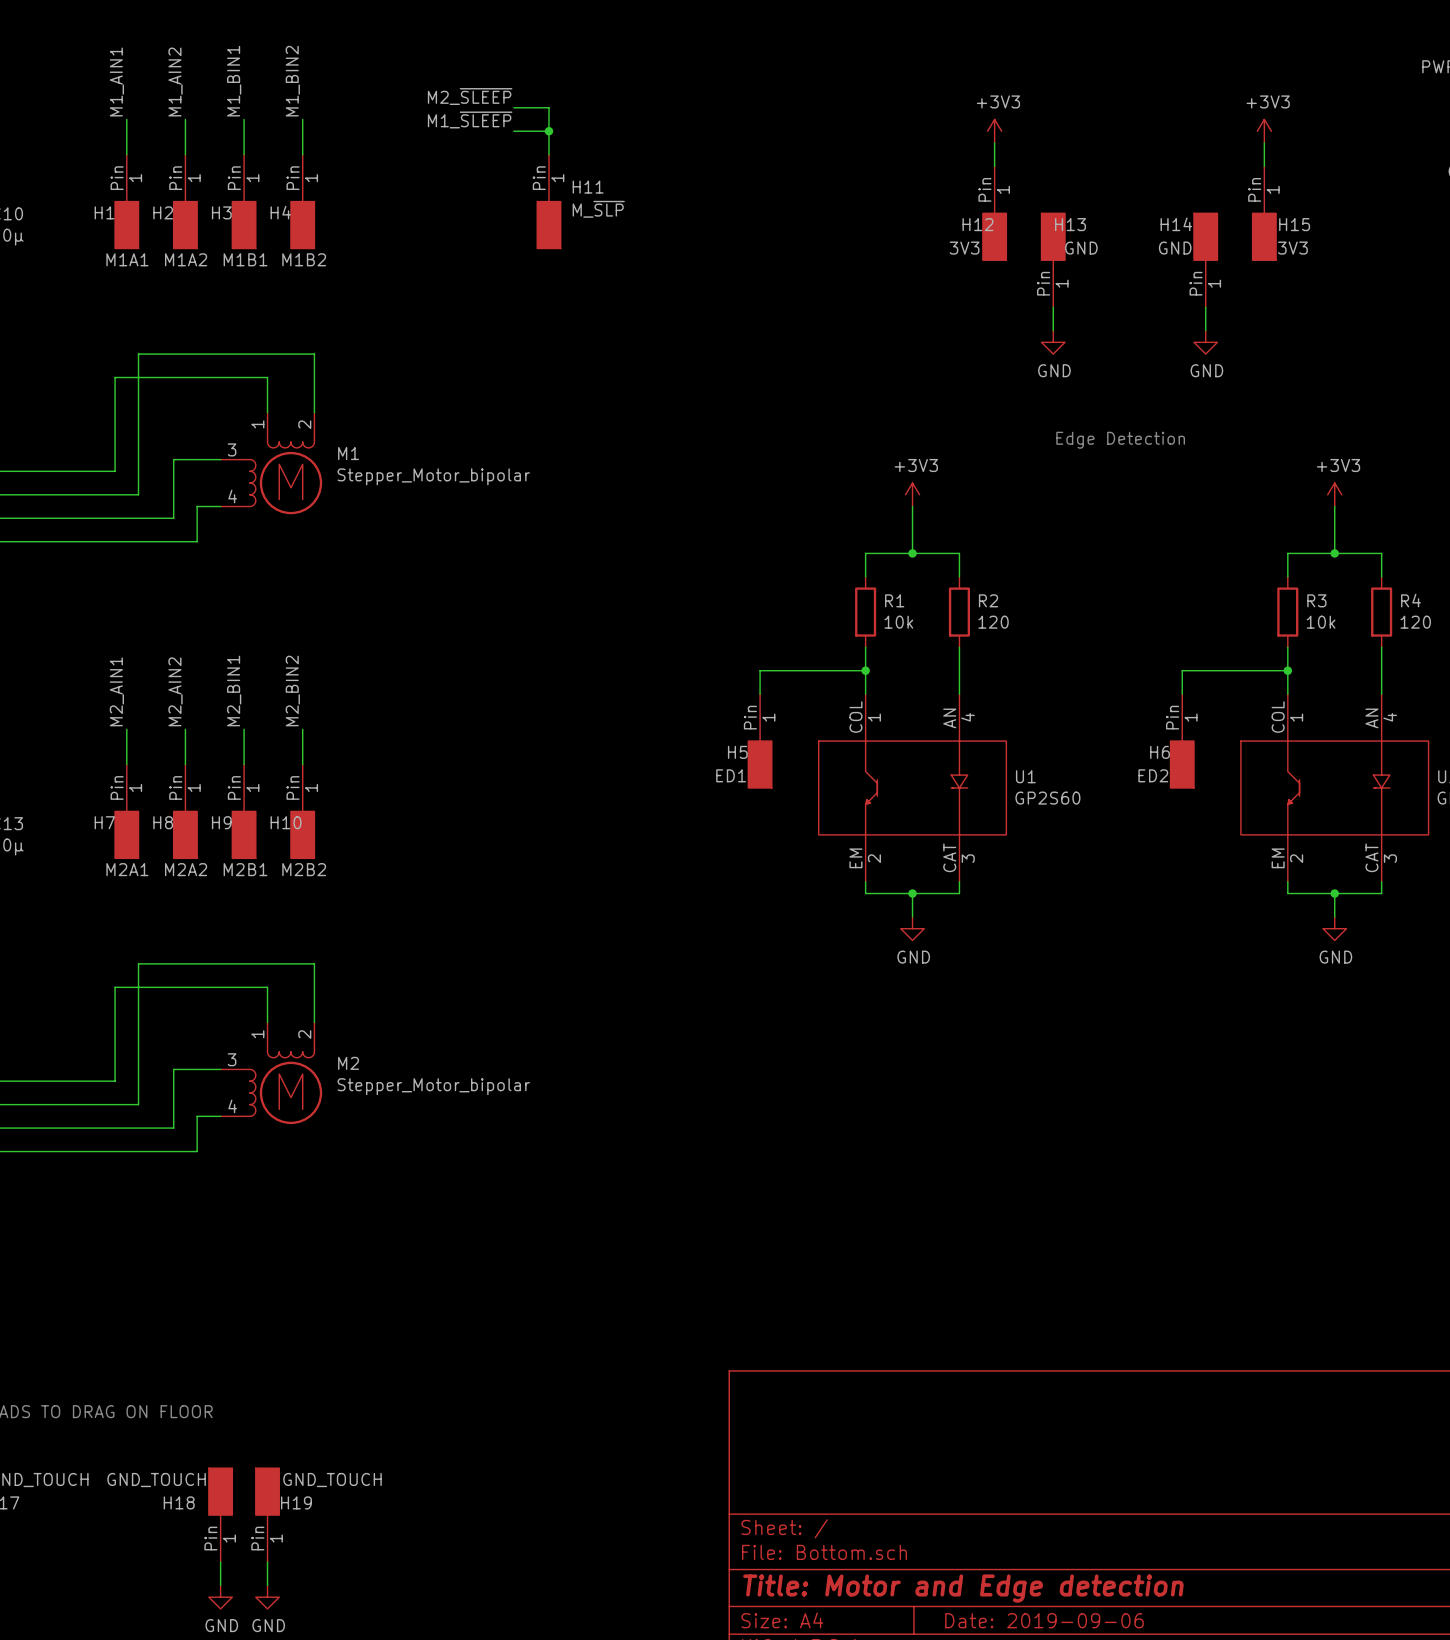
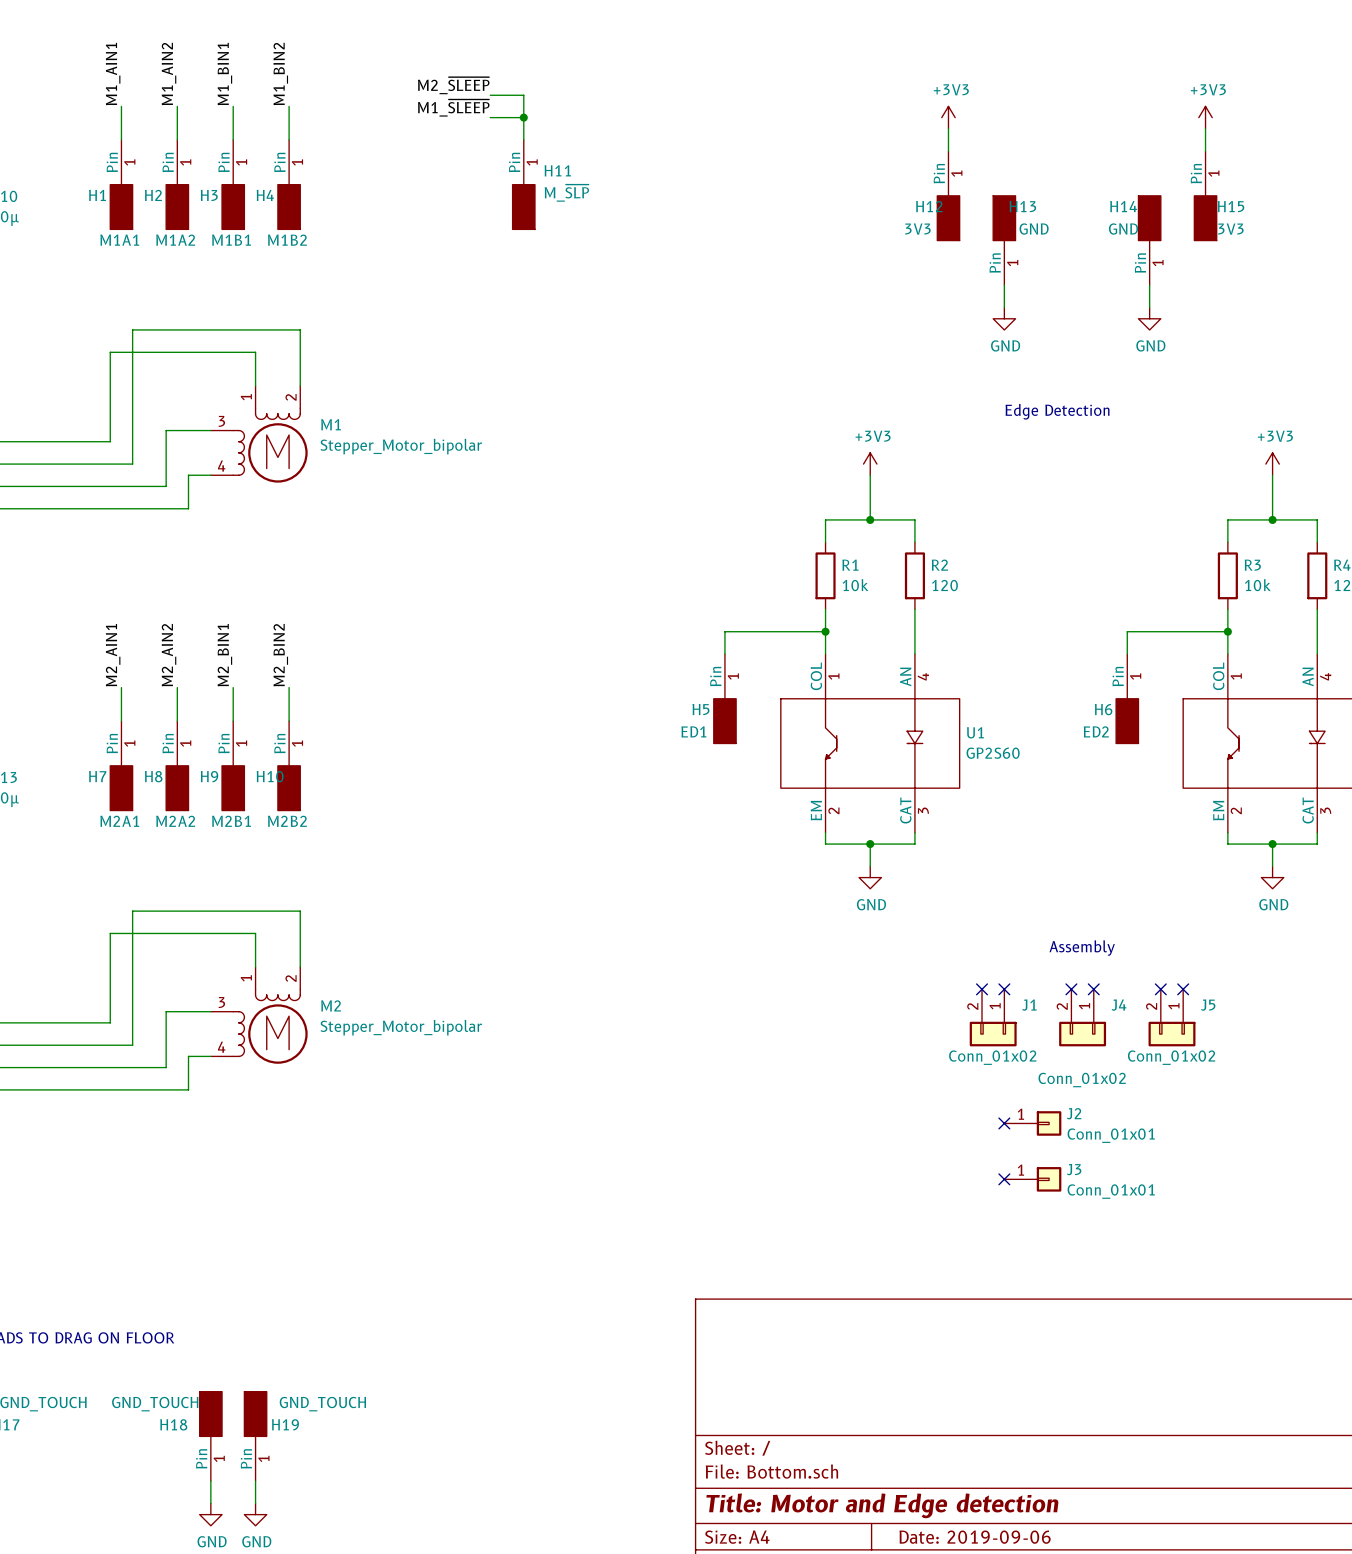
text: none -> Assembly (1082, 948)
no-connect mark: none -> (982, 989)
no-connect mark: none -> (1004, 989)
no-connect mark: none -> (1071, 989)
no-connect mark: none -> (1093, 989)
no-connect mark: none -> (1160, 989)
no-connect mark: none -> (1183, 989)
J1: none -> Conn_01x02 (993, 1017)
J4: none -> Conn_01x02 (1082, 1017)
J5: none -> Conn_01x02 (1171, 1017)
no-connect mark: none -> (1004, 1123)
J2: none -> Conn_01x01 (1032, 1123)
no-connect mark: none -> (1004, 1179)
J3: none -> Conn_01x01 (1032, 1179)

